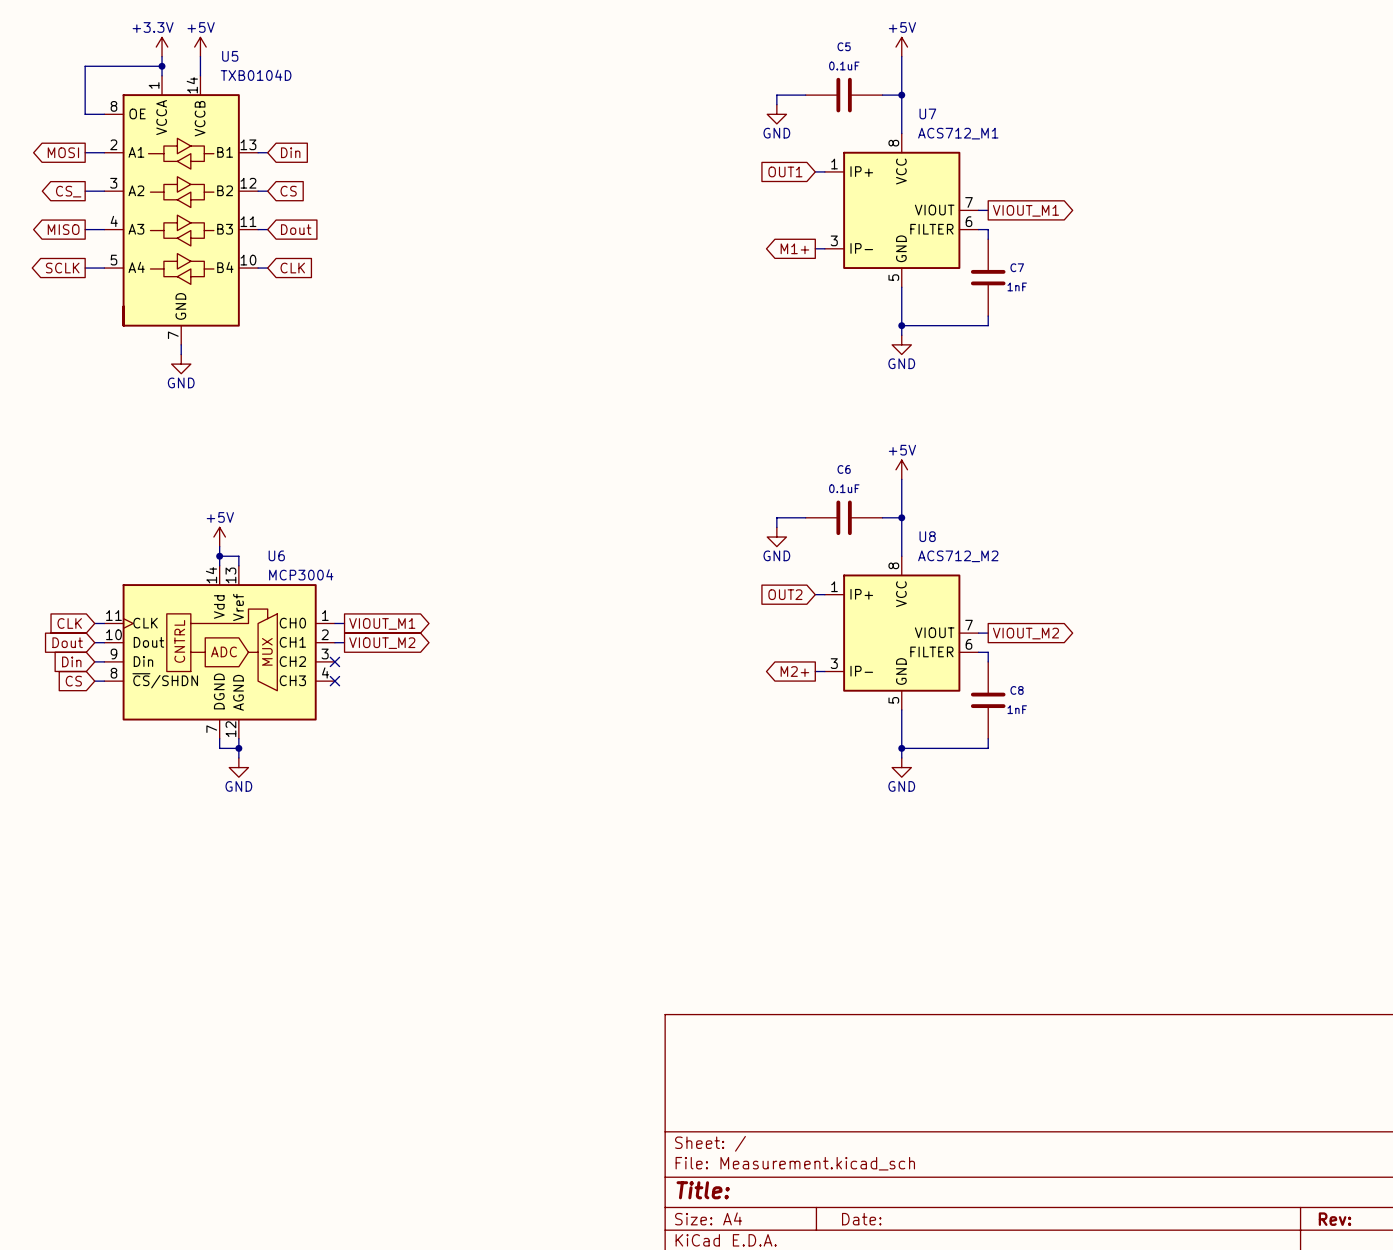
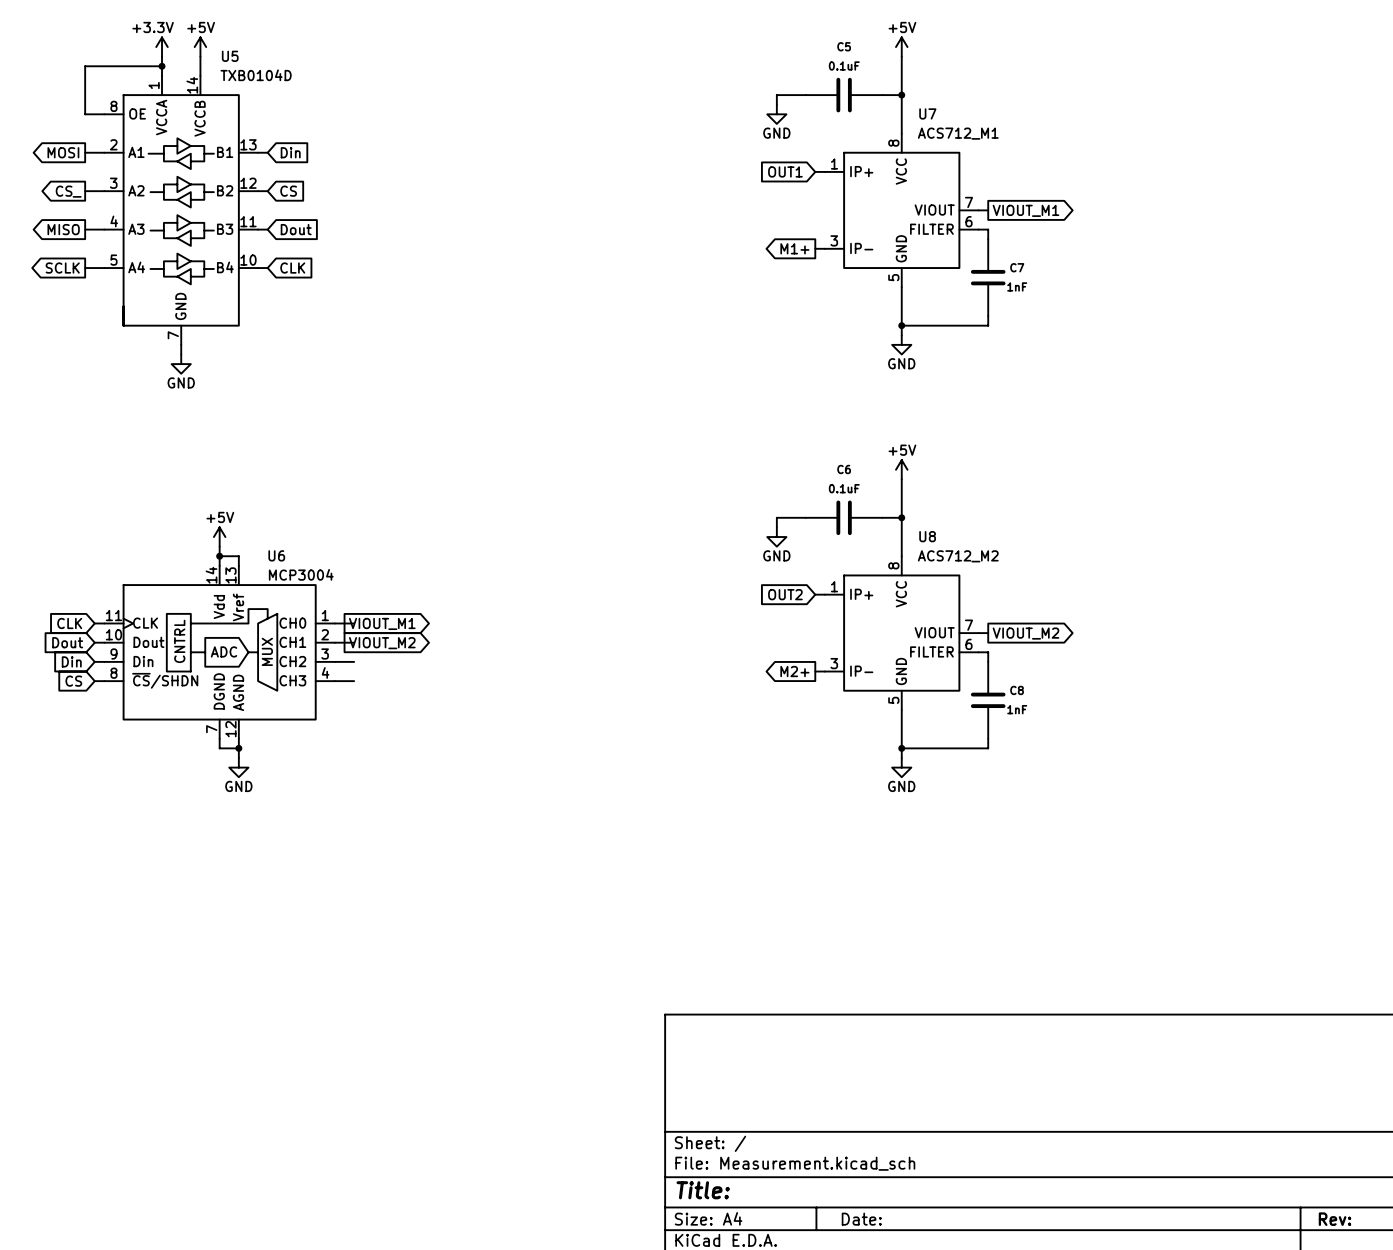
wire: none -> (344, 623) (354, 623)
wire: none -> (344, 642) (354, 642)
wire: none -> (334, 661) (354, 661)
no-connect mark: (334, 661) -> none
wire: none -> (334, 681) (354, 681)
no-connect mark: (334, 681) -> none

